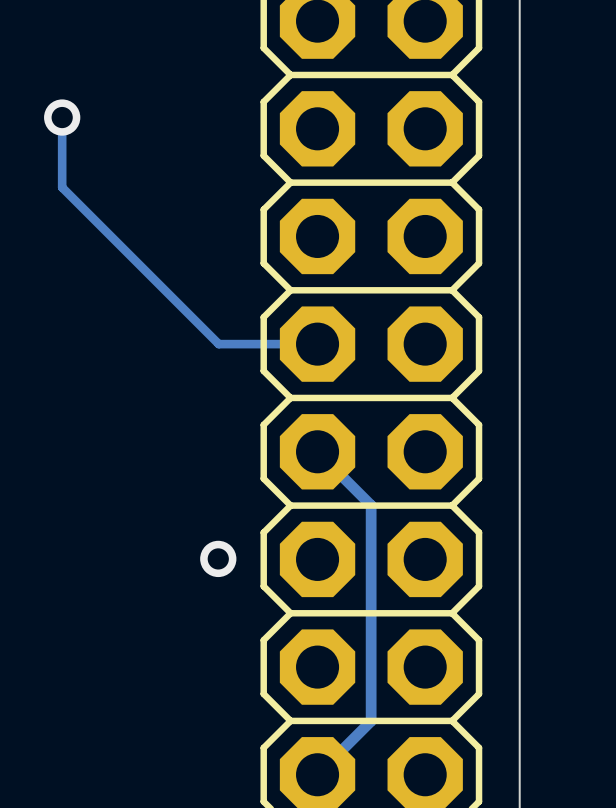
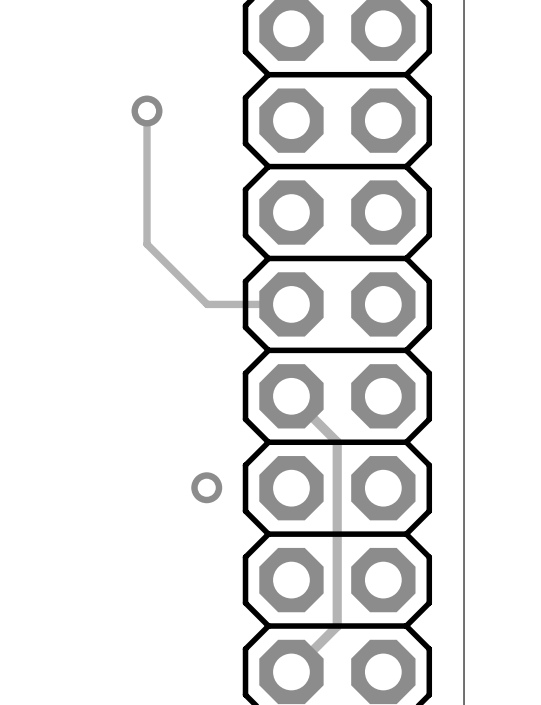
track: (62, 117) (62, 187) (148, 273) -> (147, 111) (147, 244)
via position: (62, 117) -> (147, 111)

